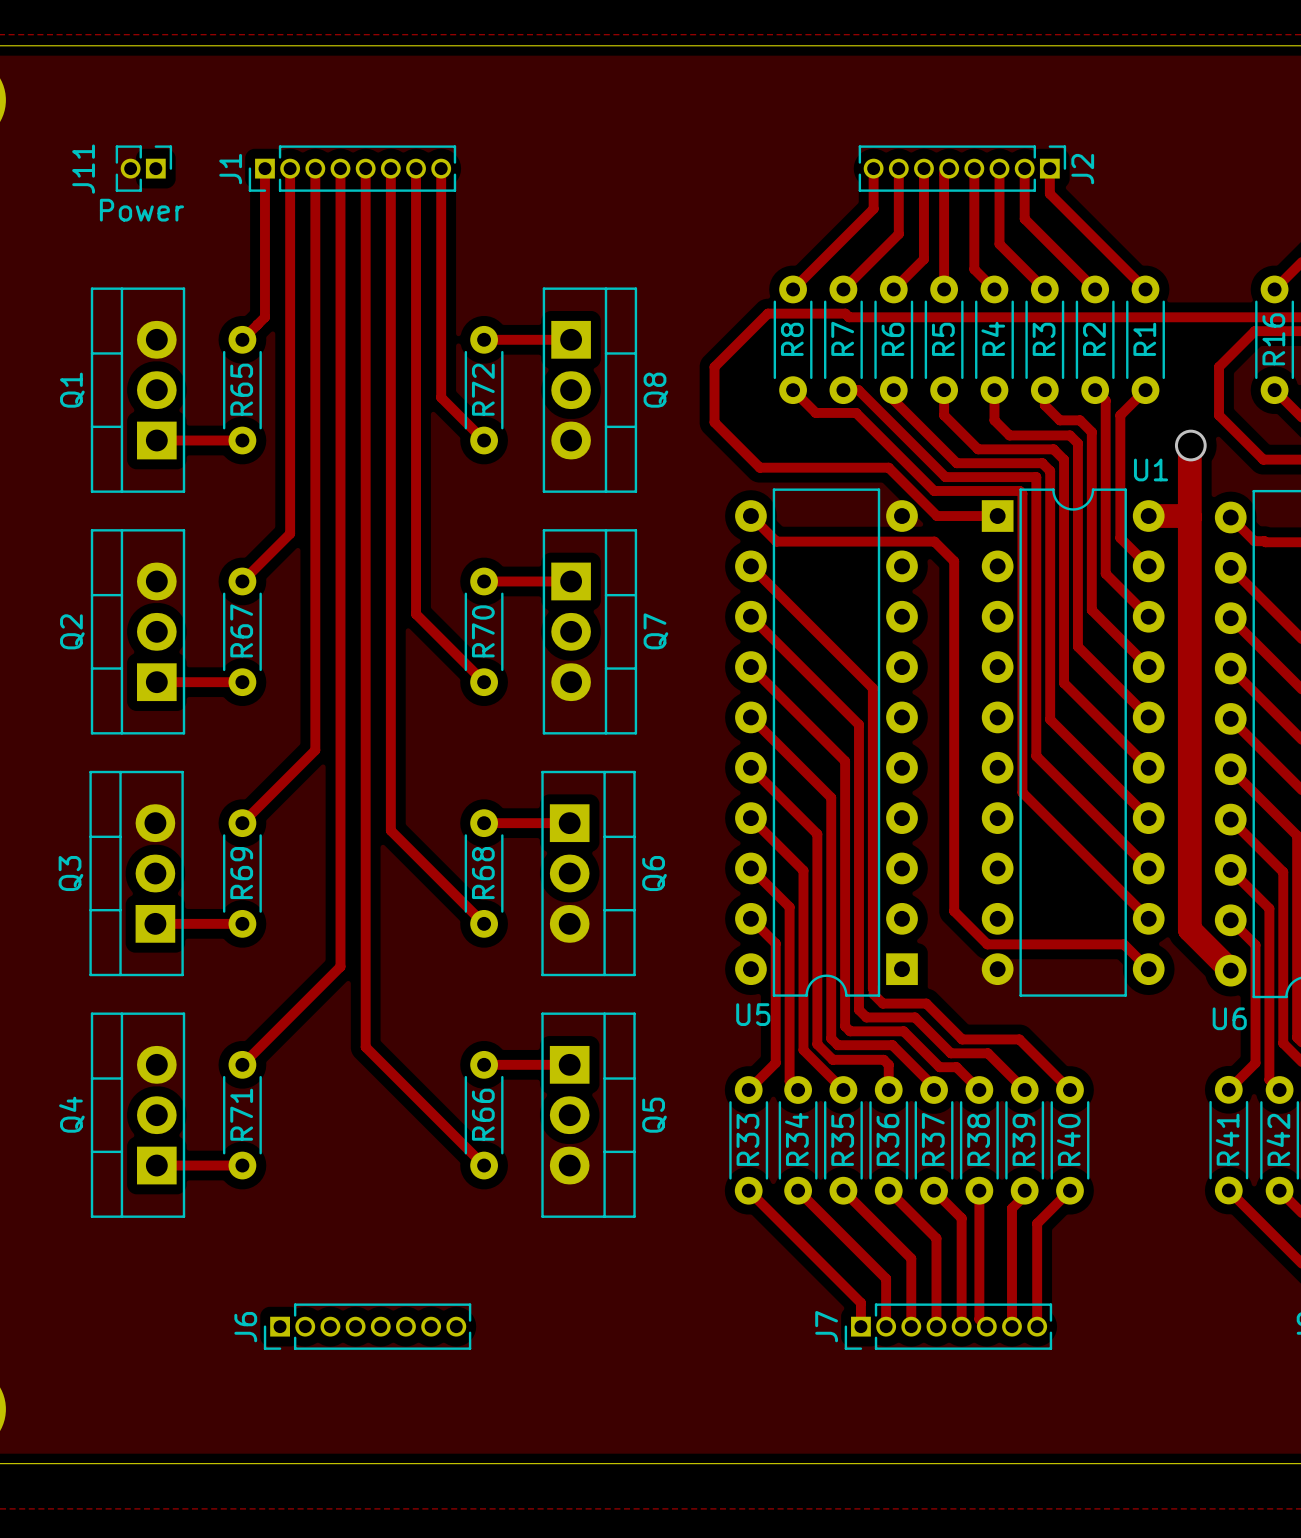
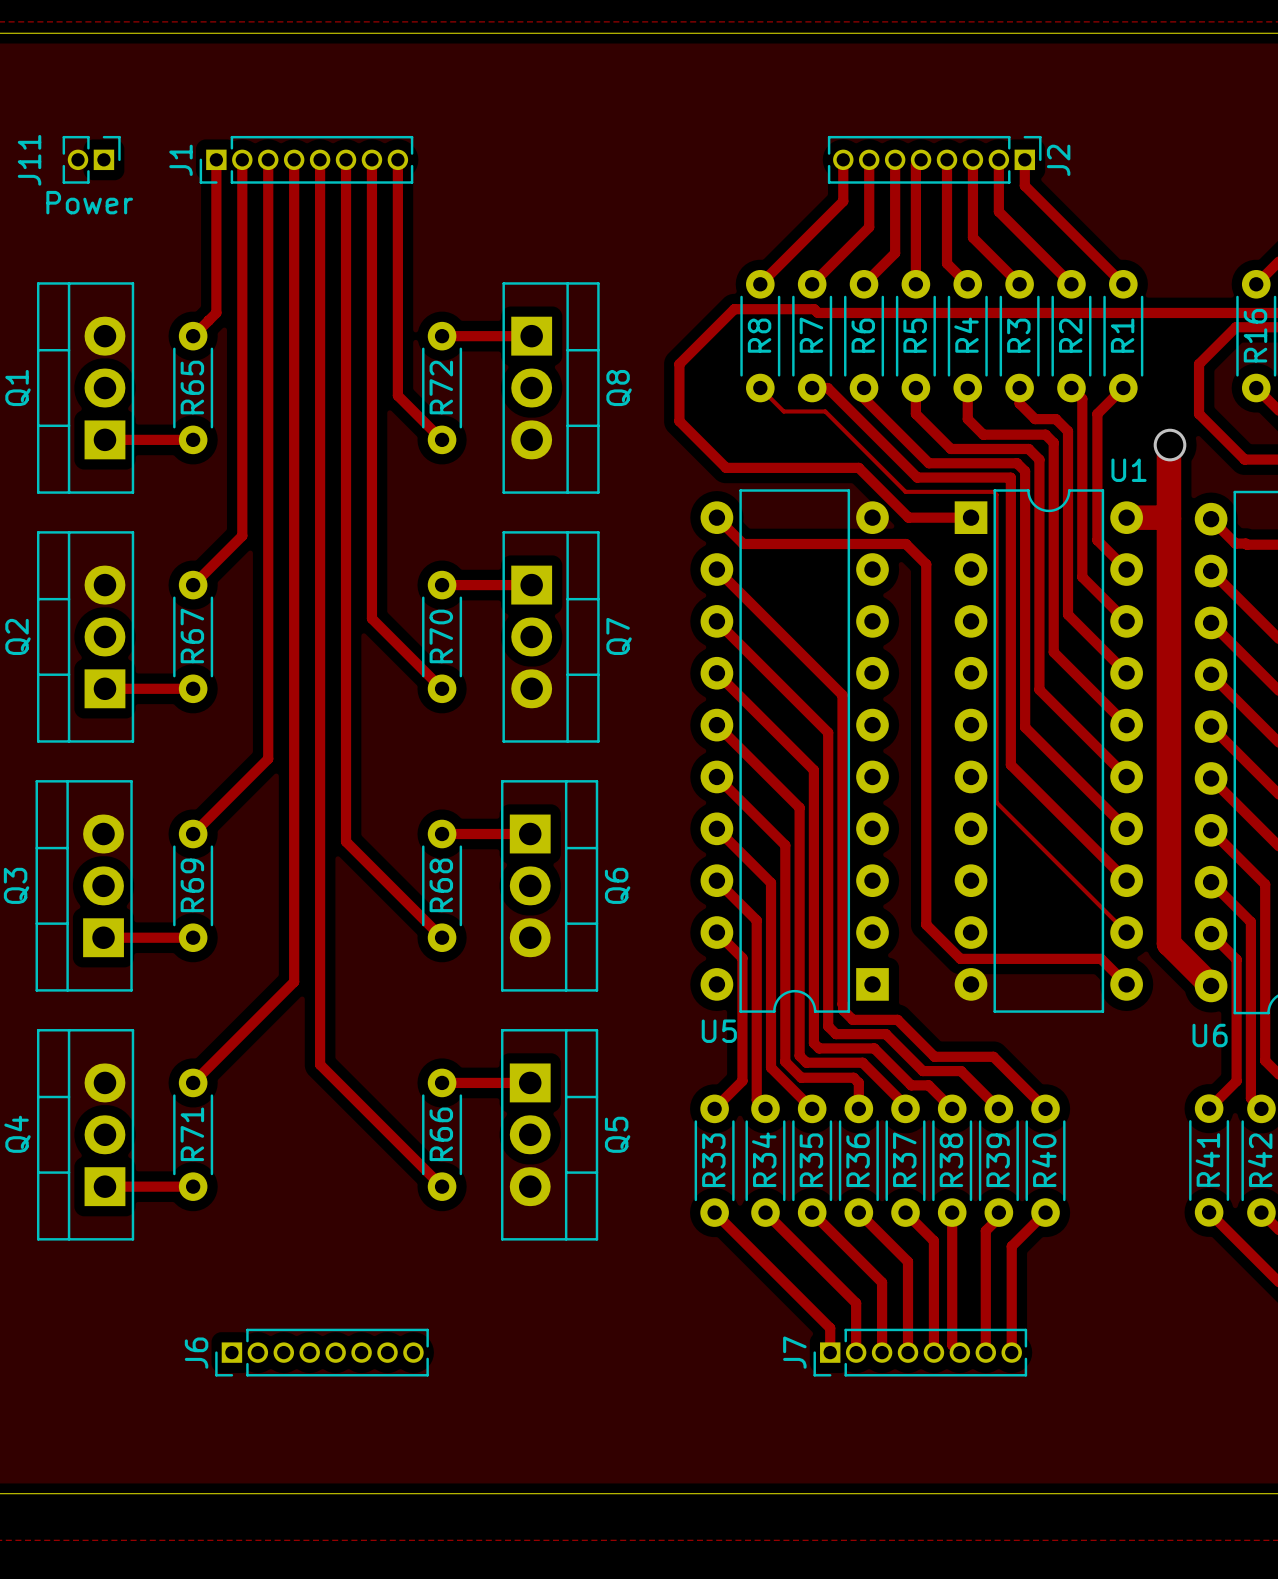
track width: thick (793, 390) (815, 412) (856, 412) (934, 490) (1019, 490) (1022, 493) (1022, 792) (1148, 918) -> thin (760, 388) (783, 411) (825, 411) (905, 491) (993, 491) (996, 494) (996, 802) (1126, 932)

